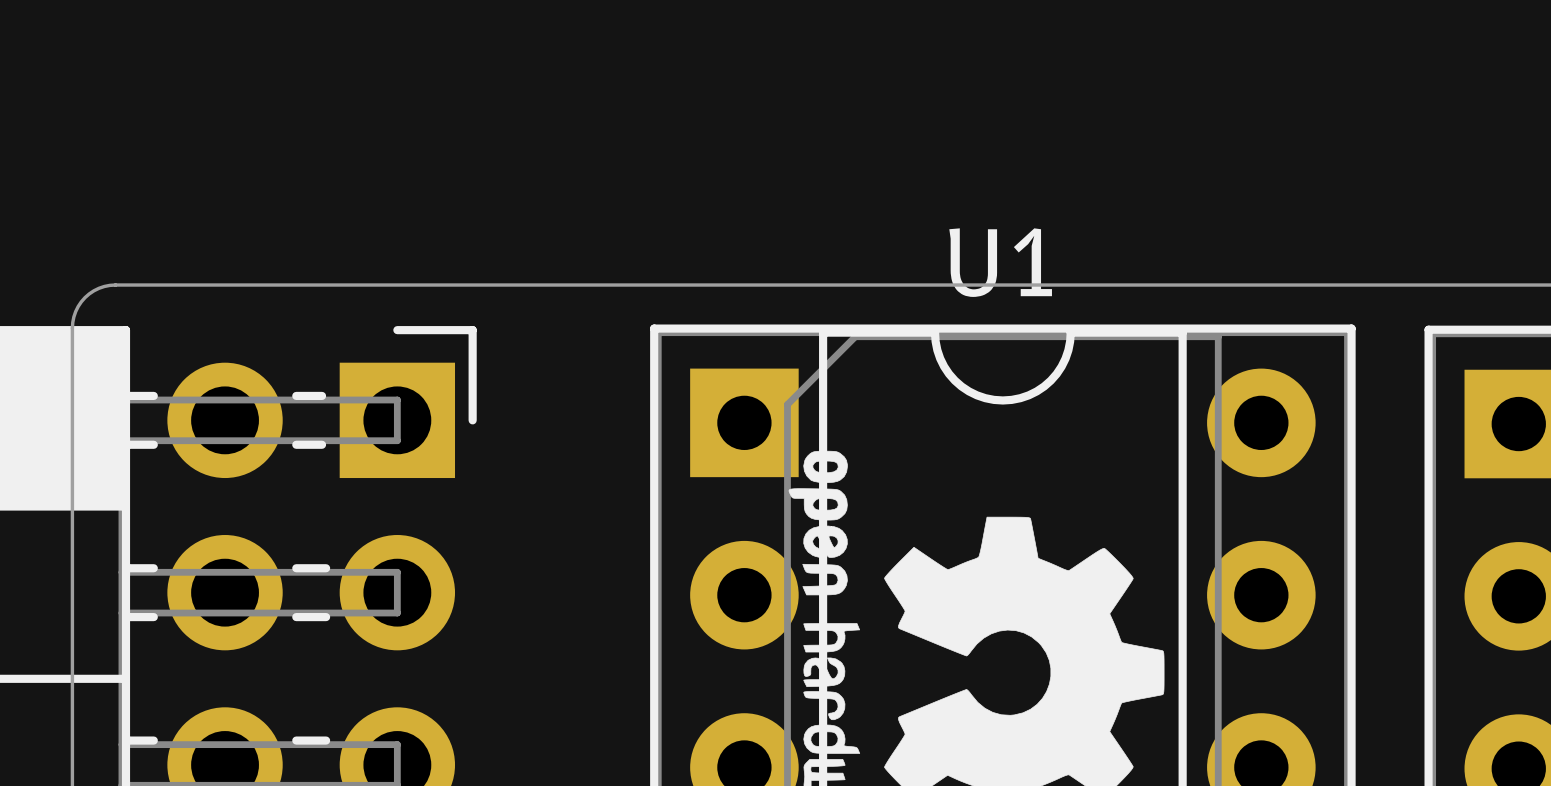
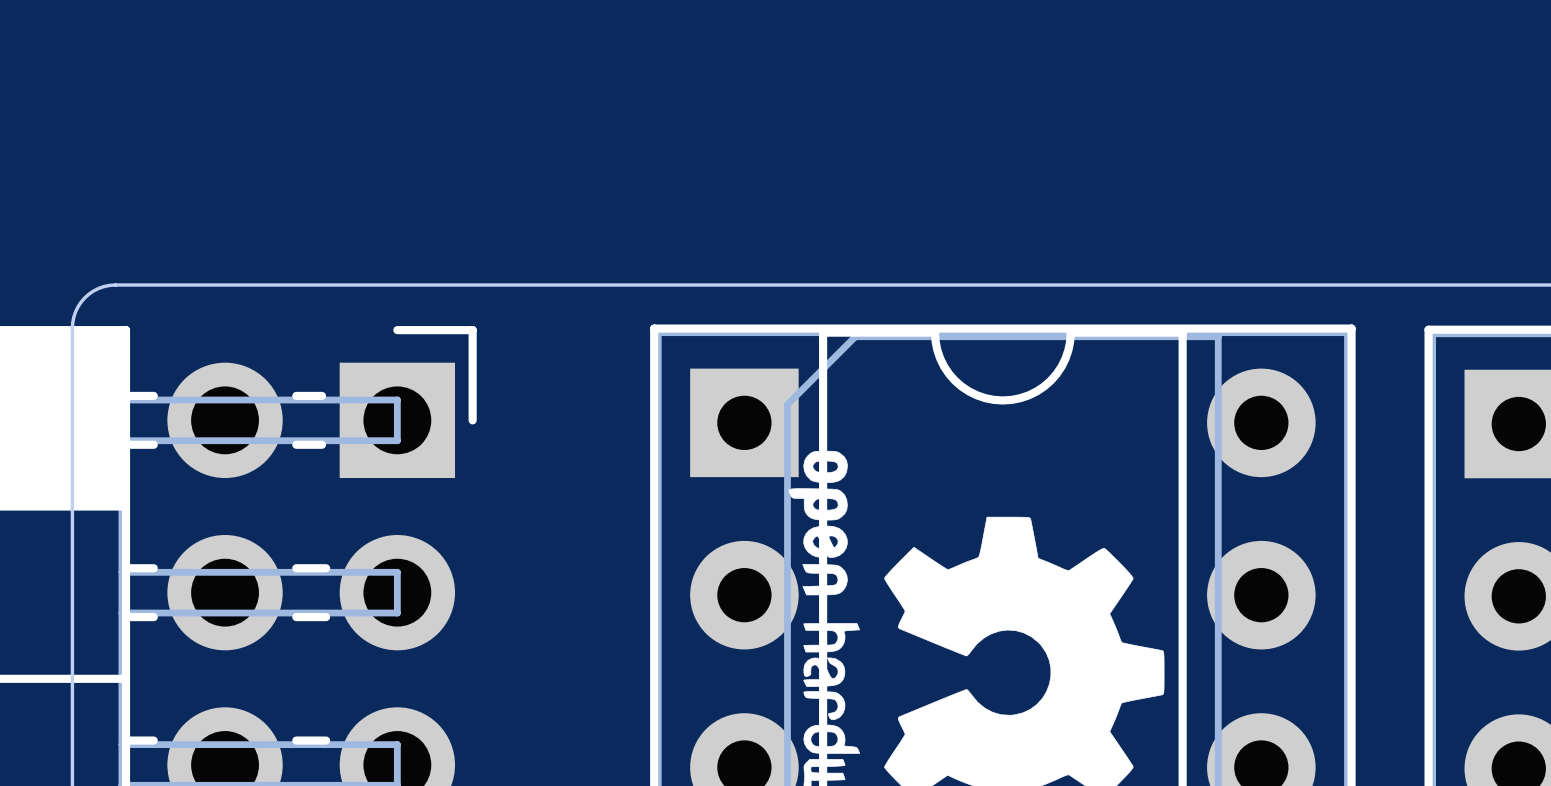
U1 name: U1 (1000, 262) -> none

